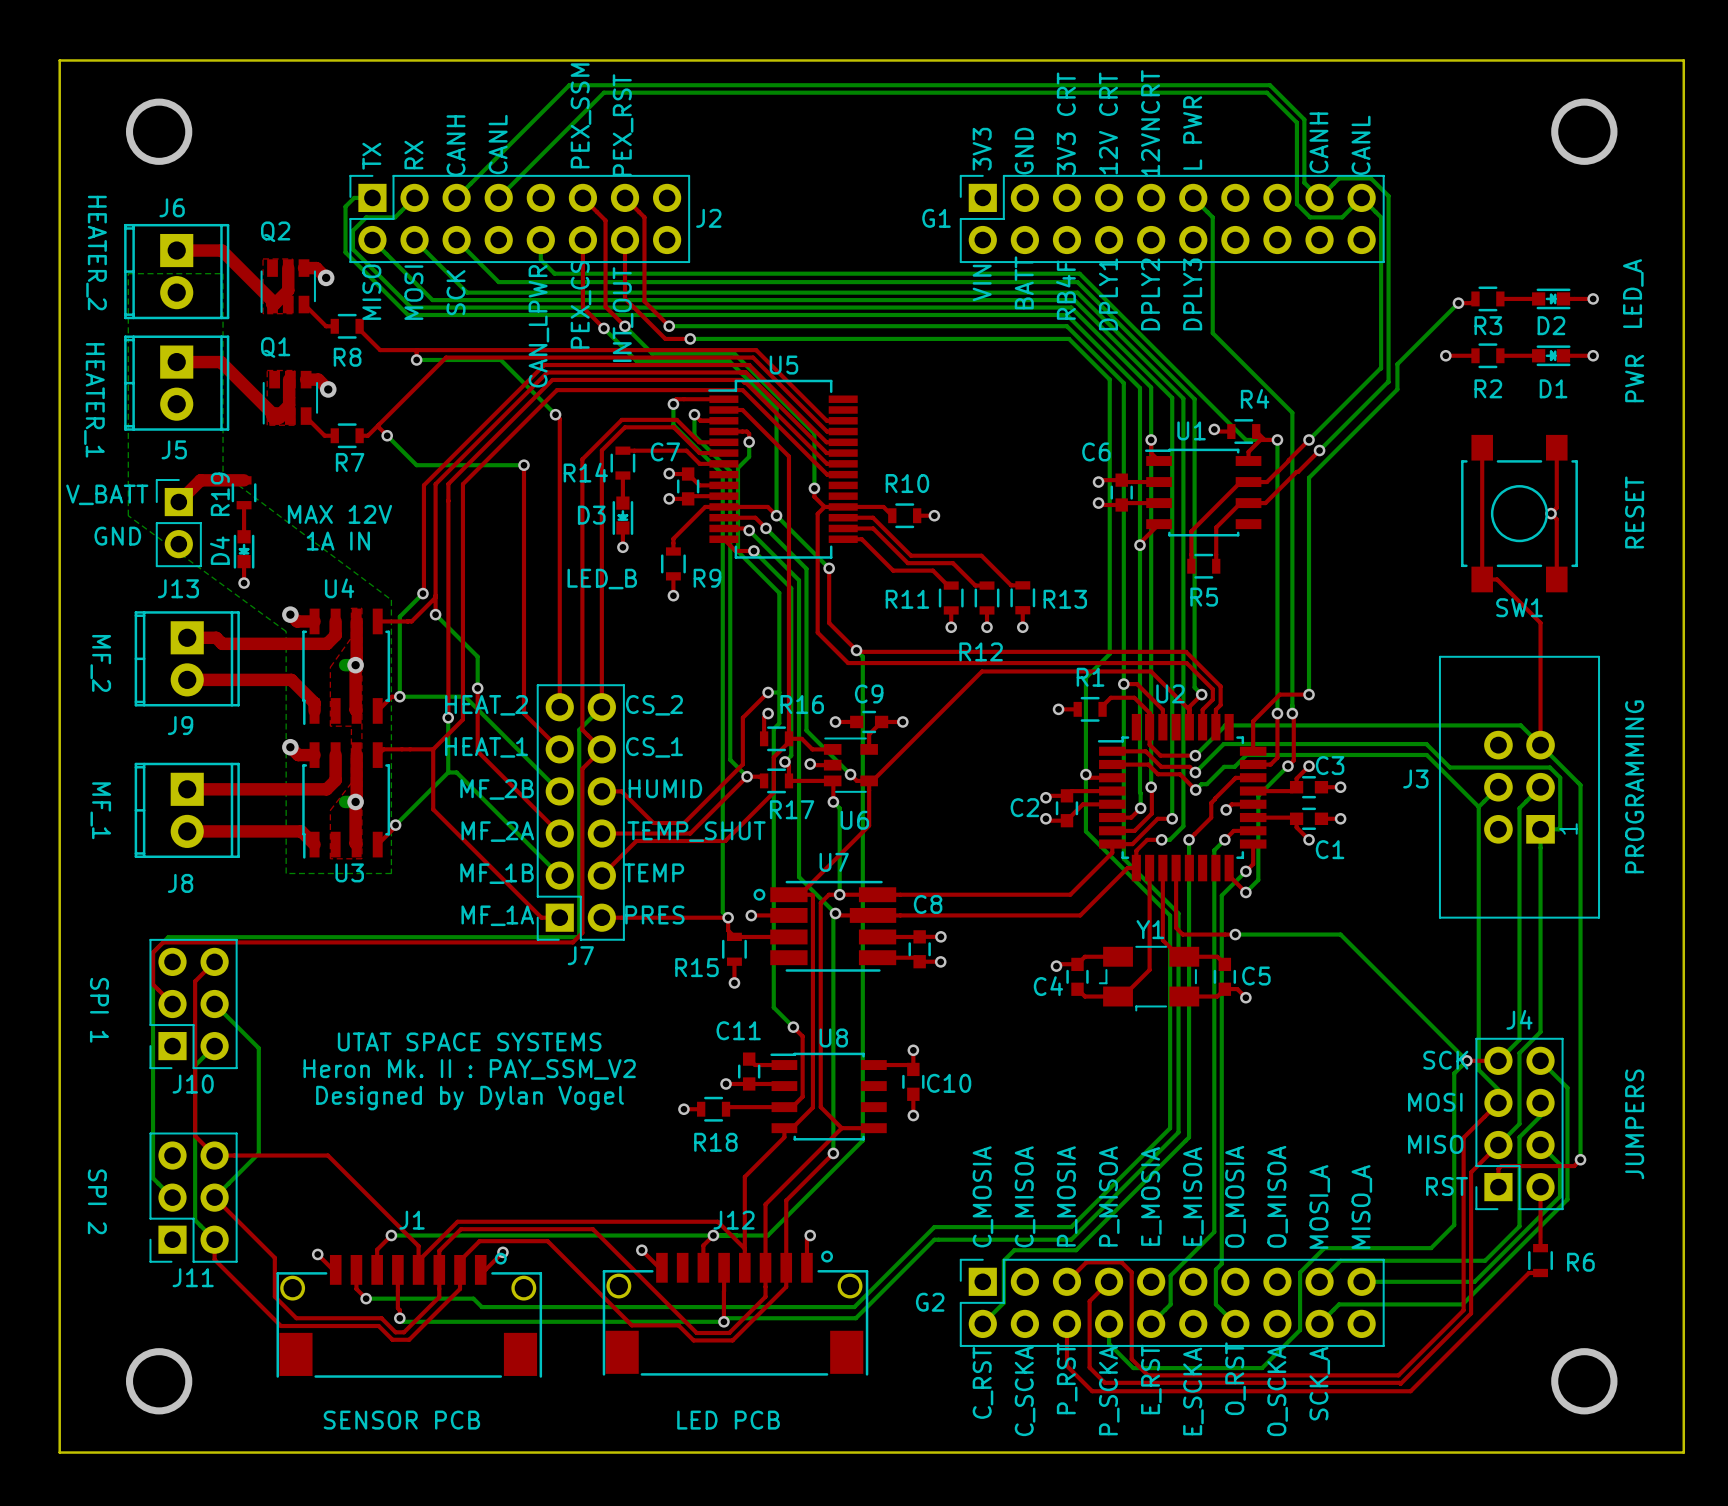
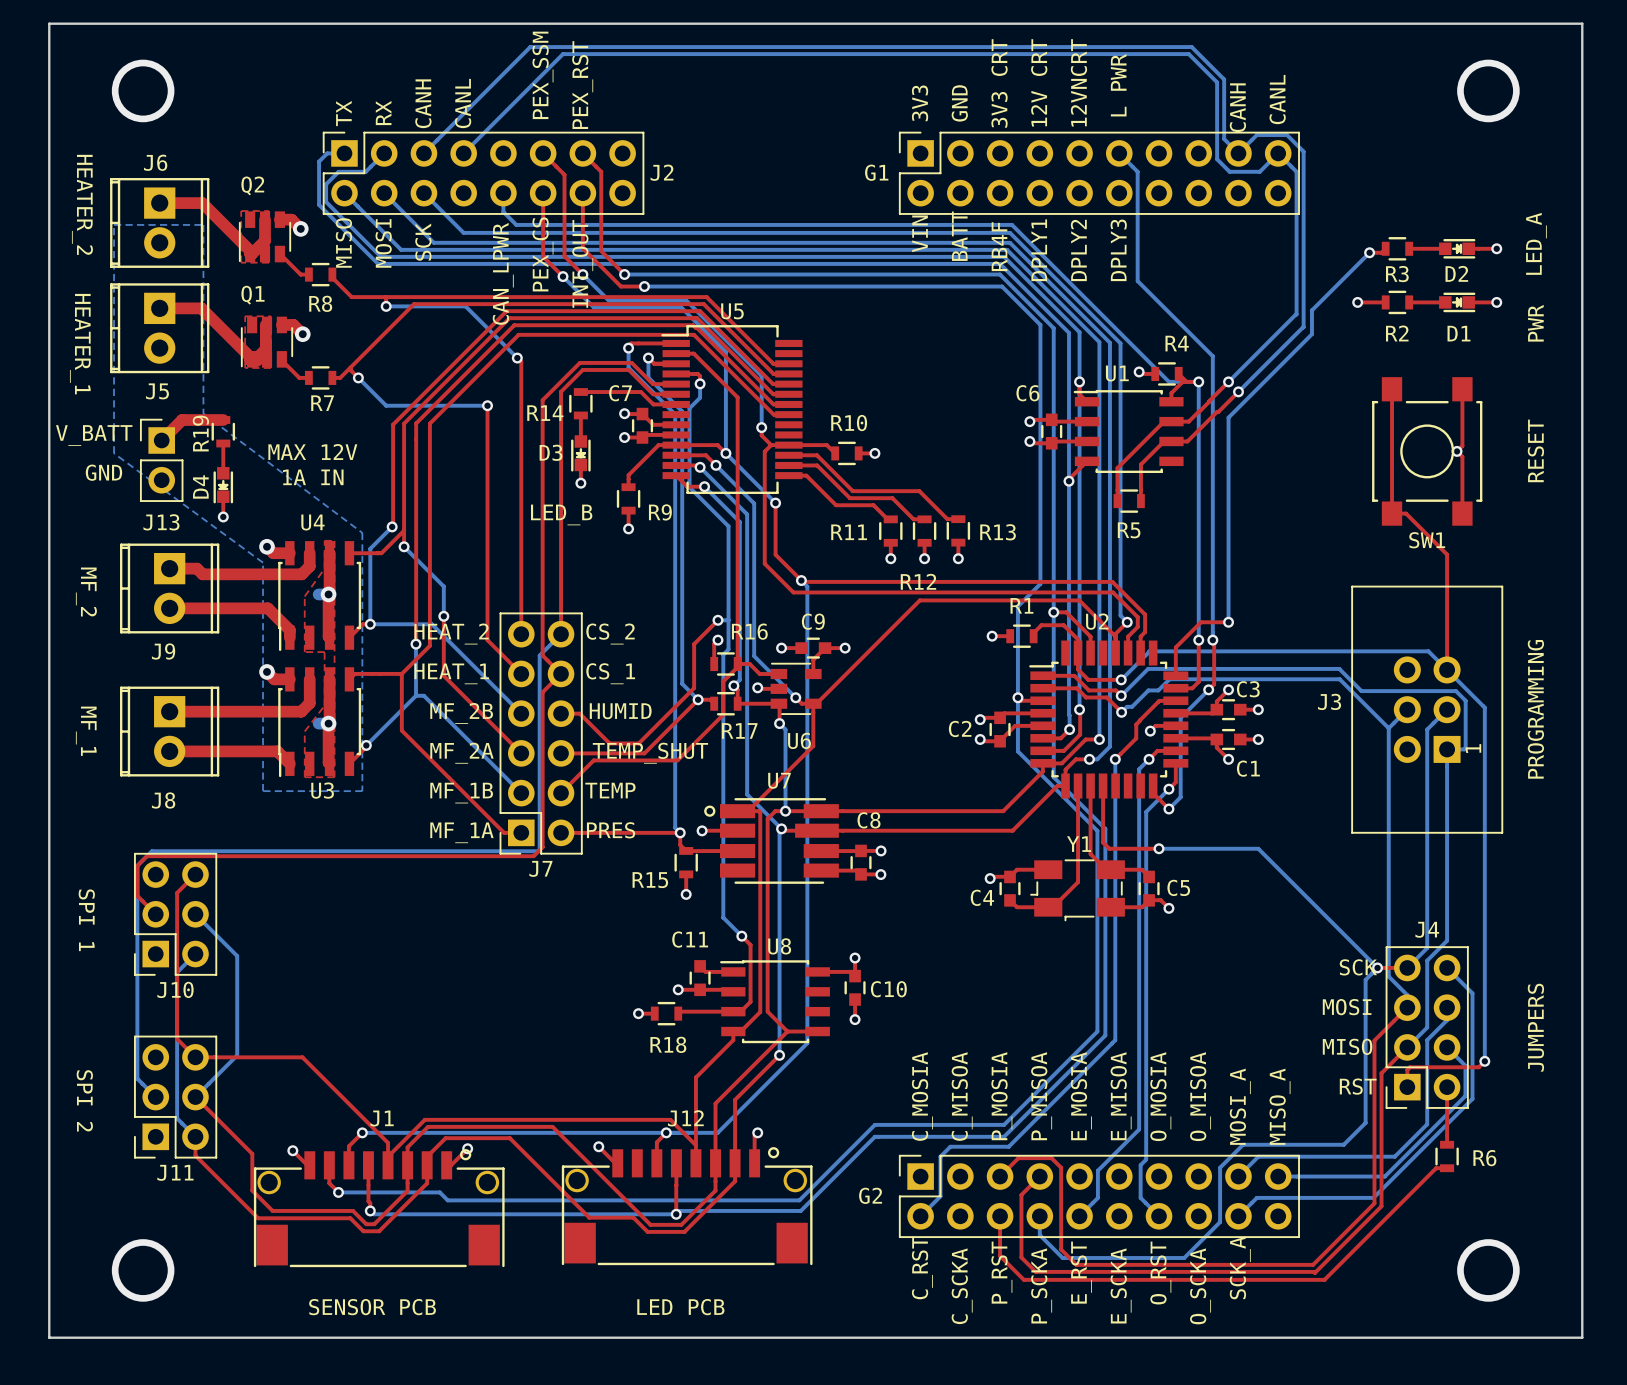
text: UTAT SPACE SYSTEMS (469, 1041) -> none
text: Heron Mk. II : PAY_SSM_V2 (469, 1069) -> none
text: Designed by Dylan Vogel (470, 1098) -> none

